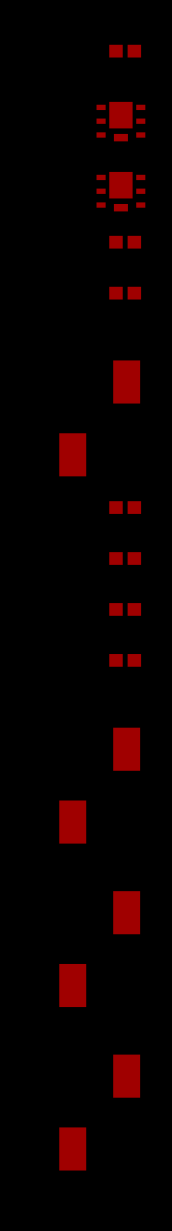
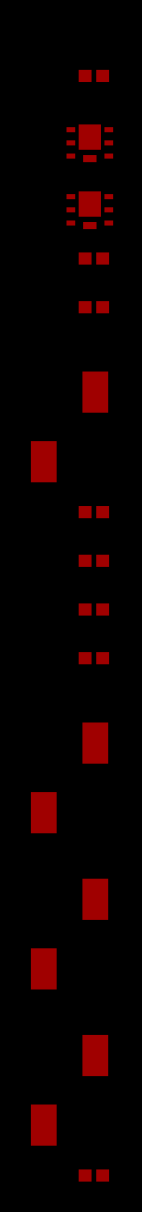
part: none -> (93, 1175)

